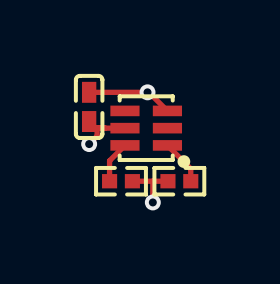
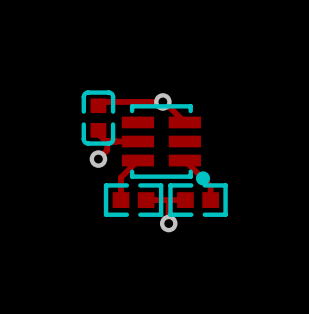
part footprint: [73, 73, 105, 140] -> [81, 90, 116, 146]

